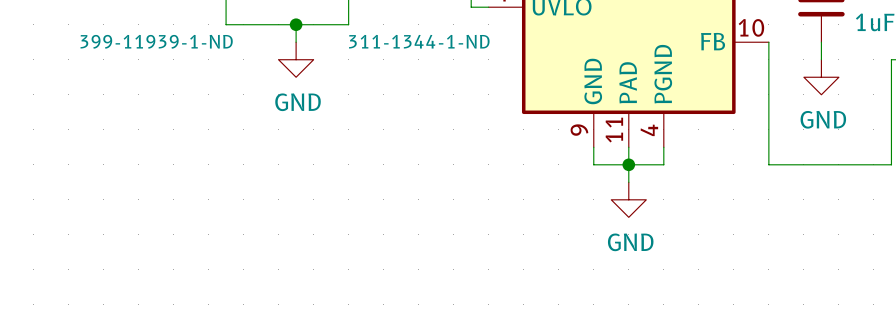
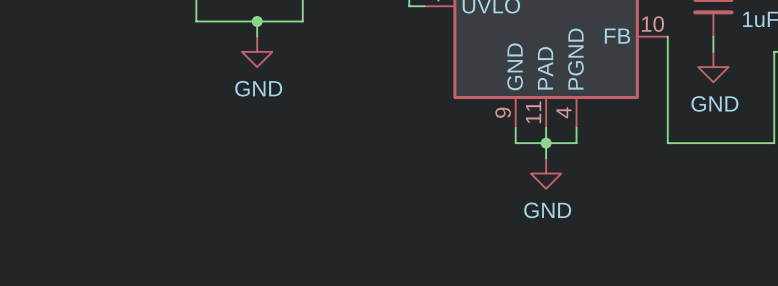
part text: 399-11939-1-ND (156, 41) -> none
part text: 311-1344-1-ND (419, 41) -> none

